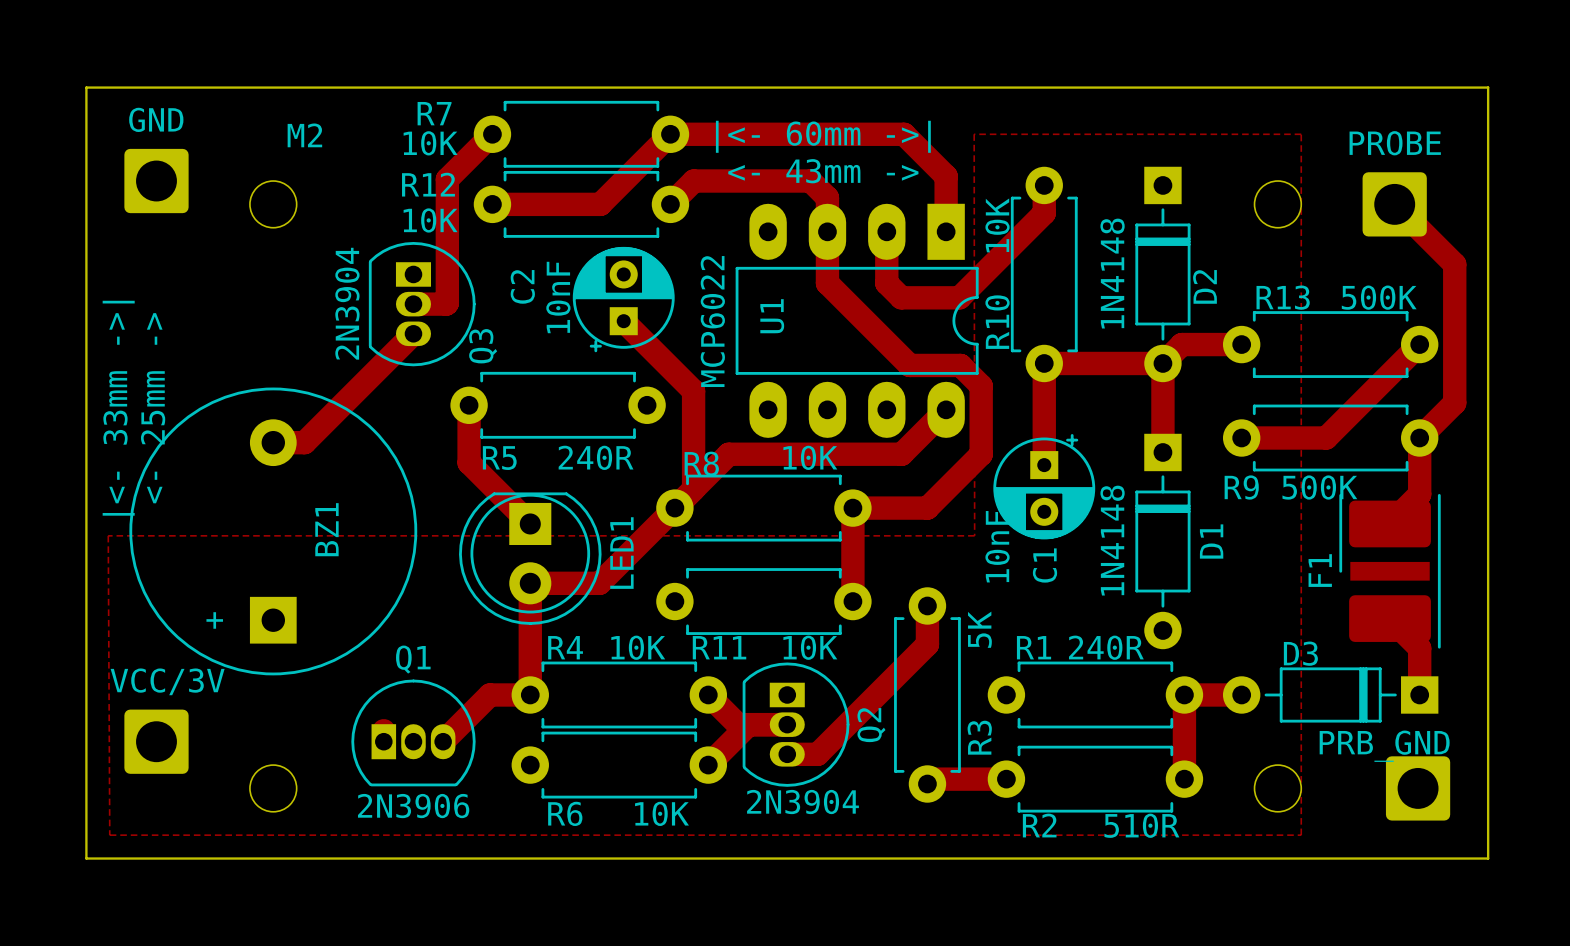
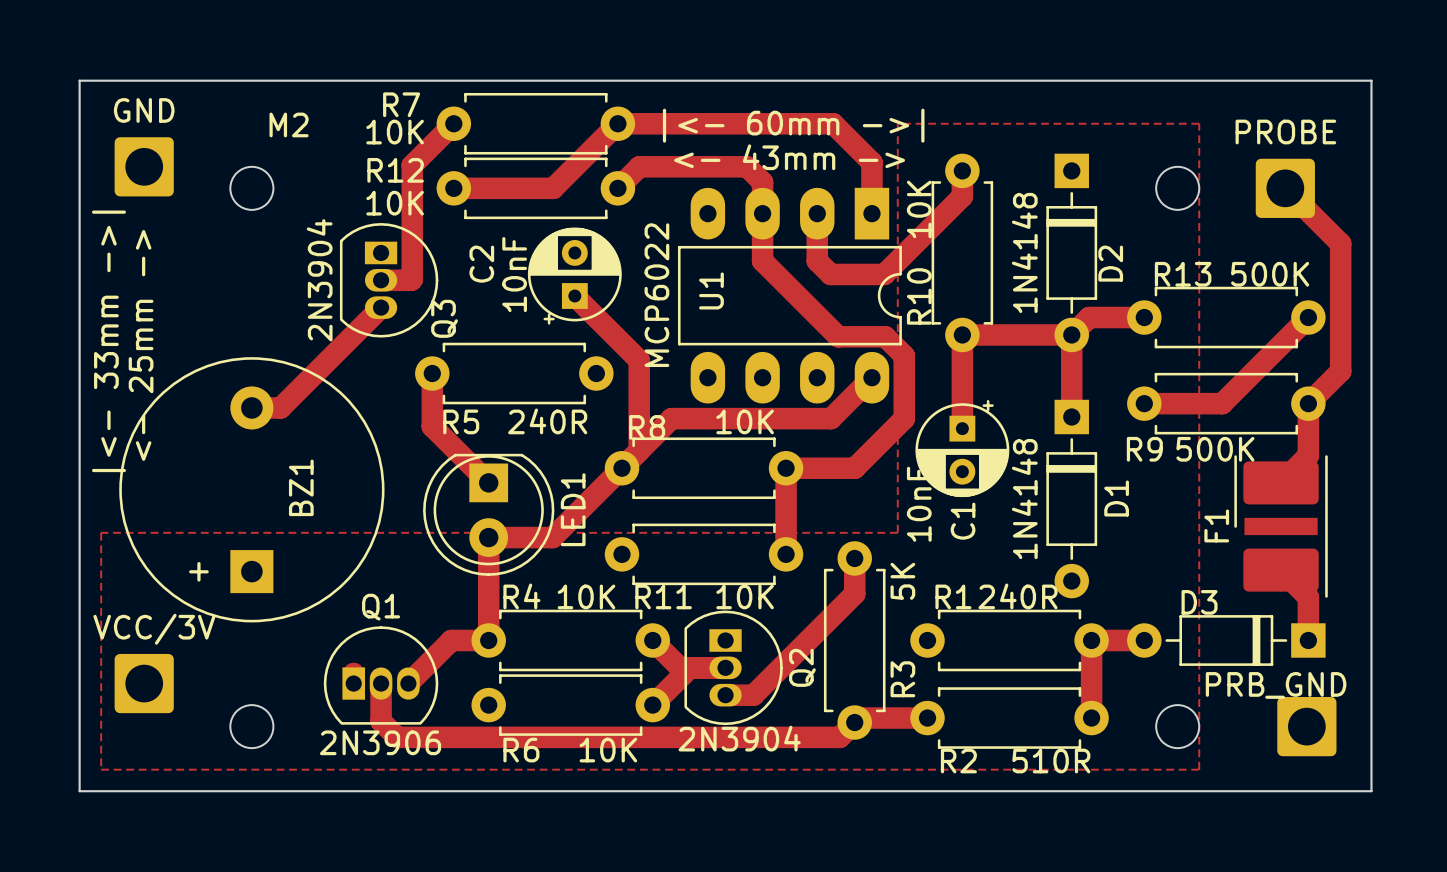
zone outline: (974, 134) (974, 535) (108, 535) (109, 835) -> (897, 123) (897, 532) (101, 532) (101, 769)
track: none -> (381, 683) (381, 721) (397, 737) (839, 737) (854, 722)

